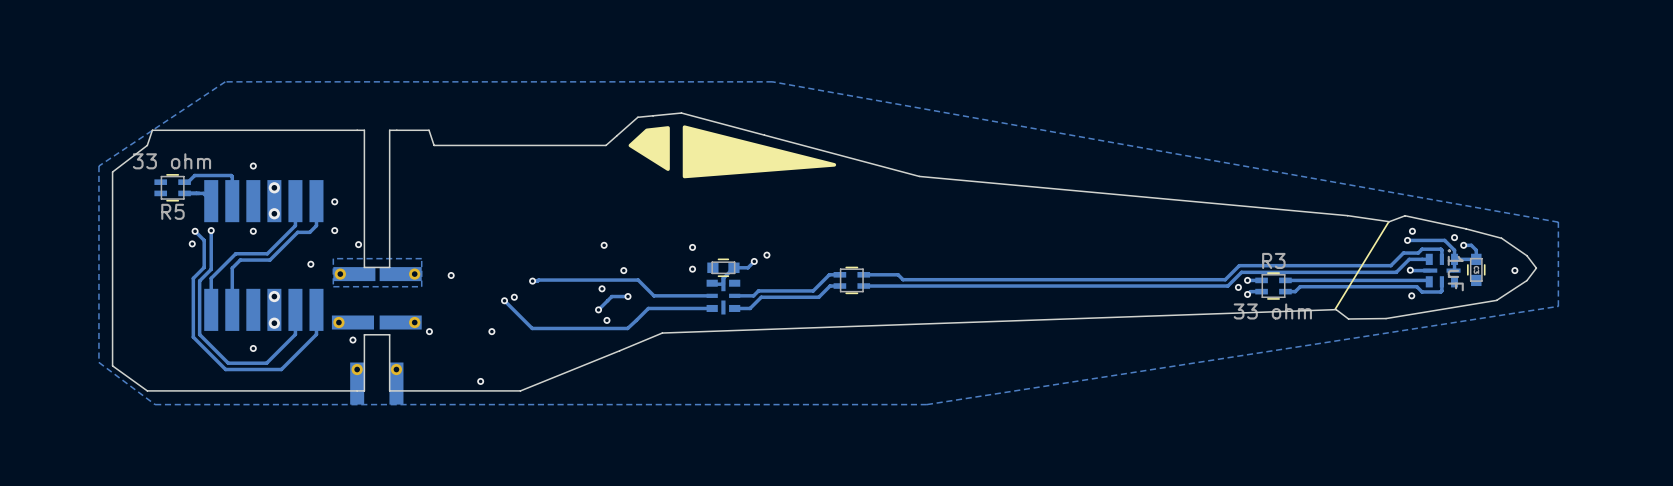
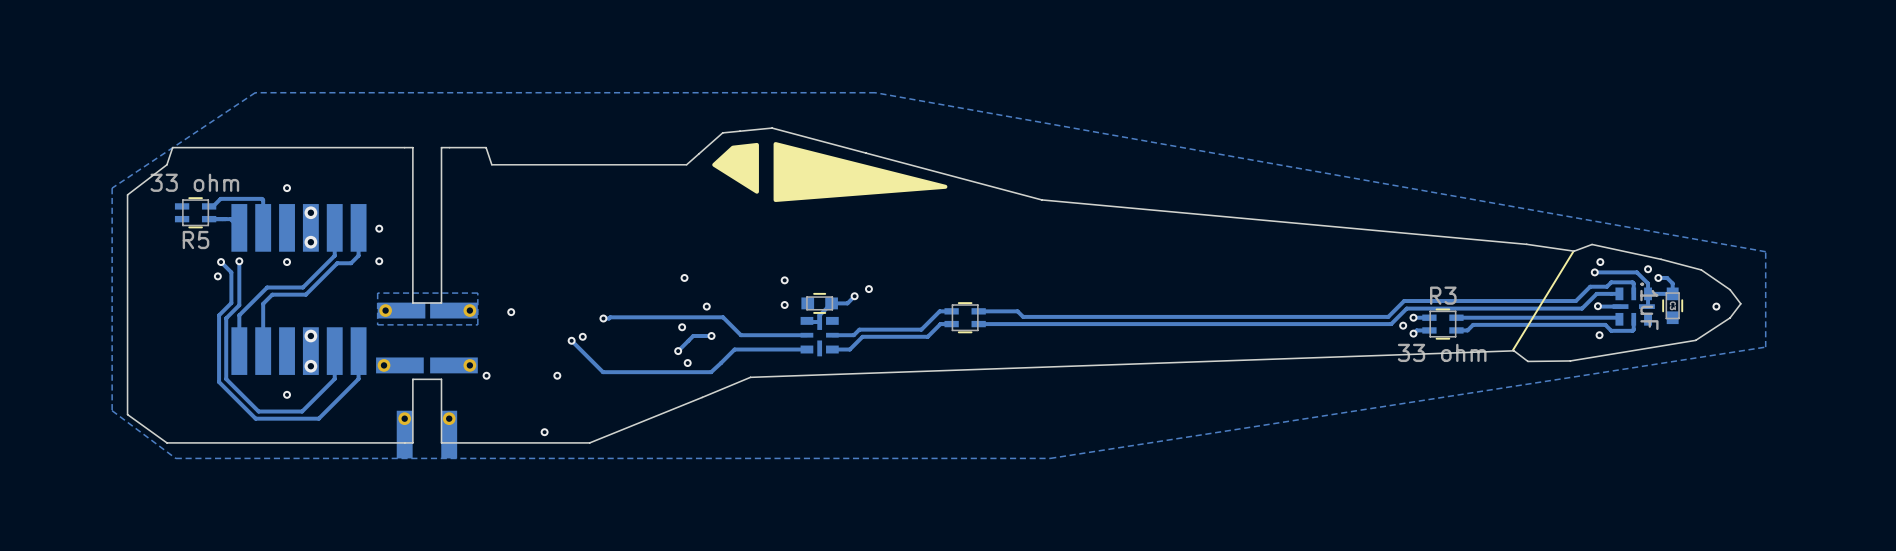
via: (358, 244) -> none
via: (310, 264) -> none
via: (352, 340) -> none

